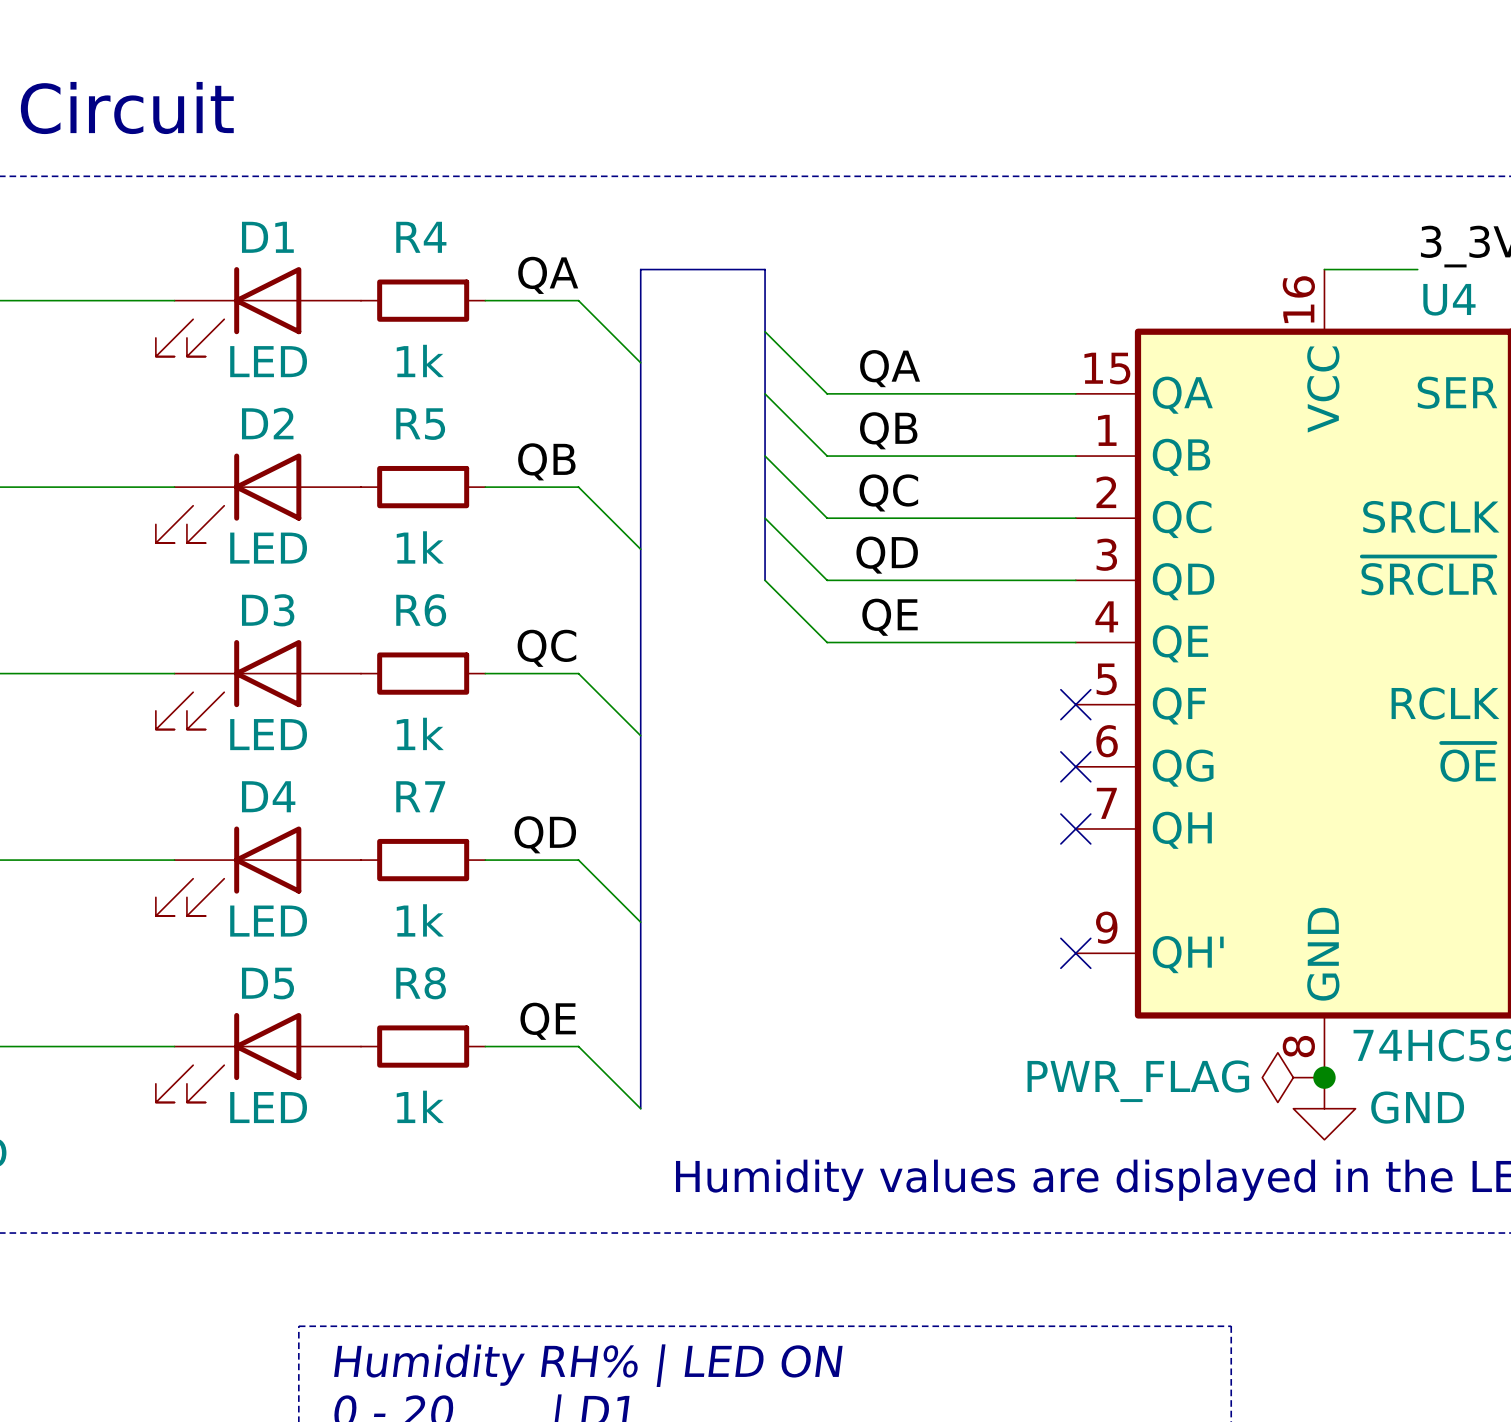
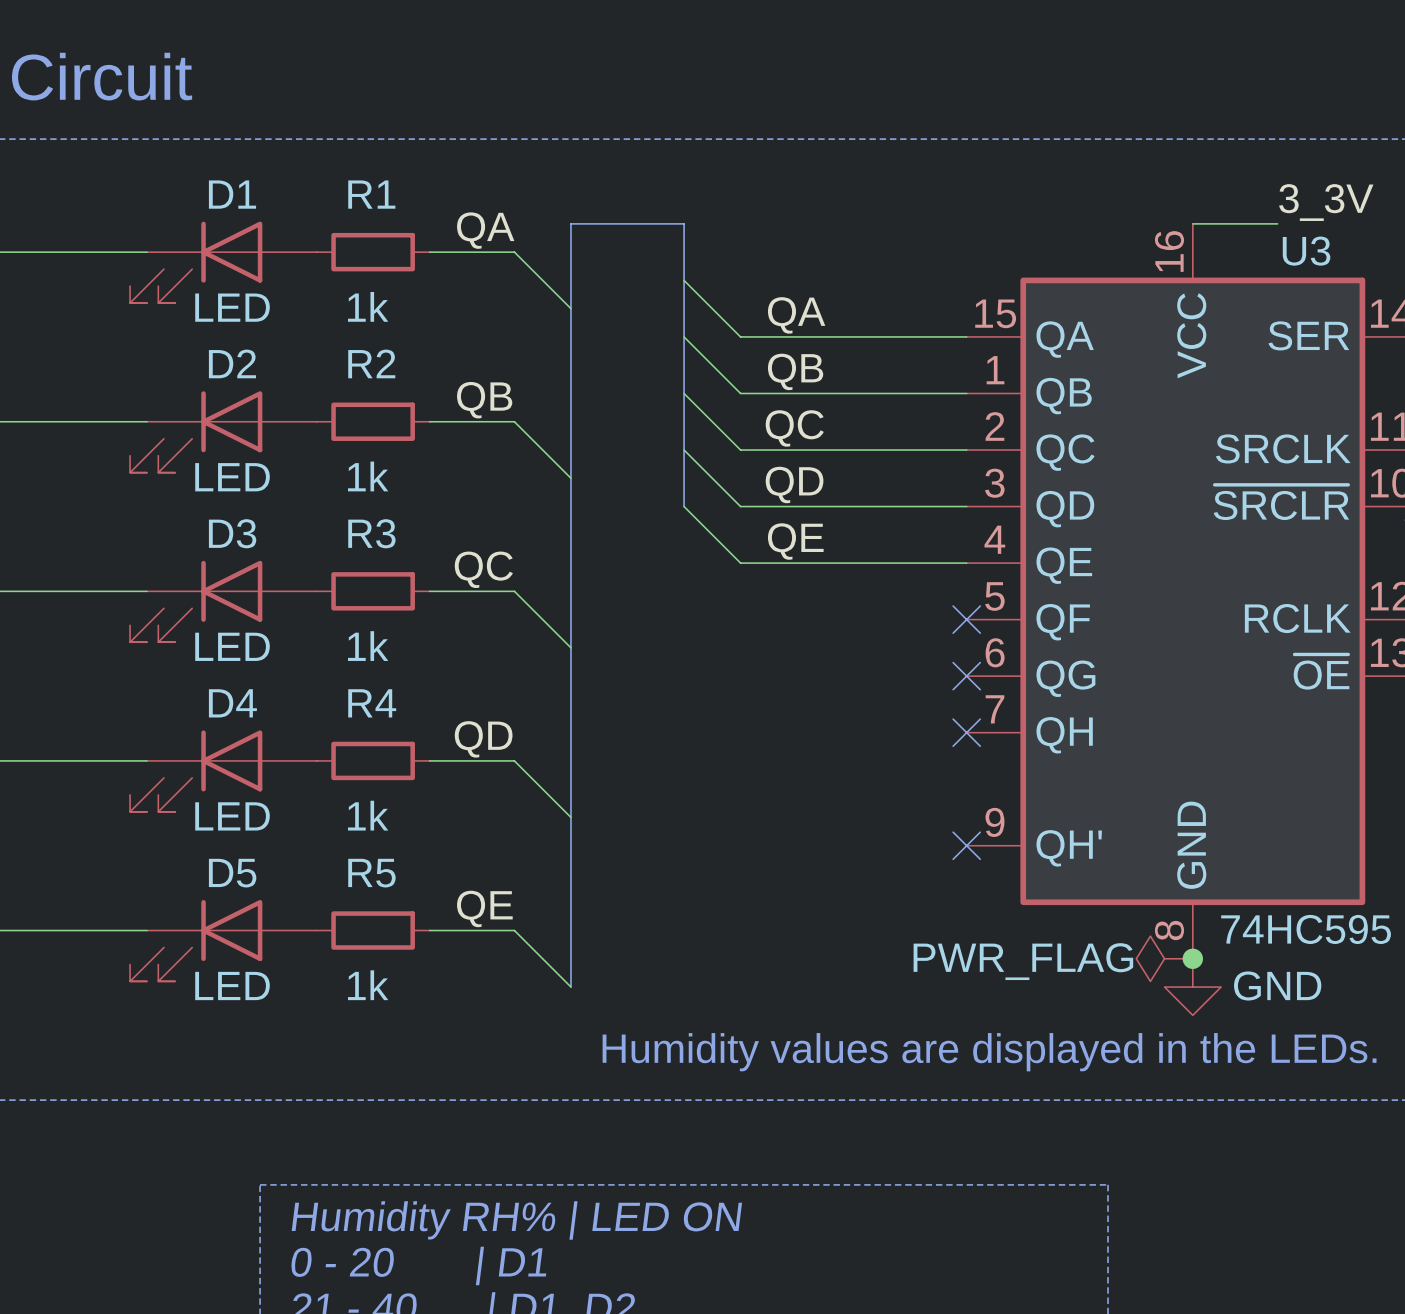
R4 name: R4 (421, 237) -> R1 (371, 194)
U4 name: U4 (1449, 299) -> U3 (1306, 251)
R5 name: R5 (420, 424) -> R2 (371, 363)
R6 name: R6 (421, 610) -> R3 (371, 533)
R7 name: R7 (420, 796) -> R4 (372, 703)
R8 name: R8 (421, 983) -> R5 (371, 873)

